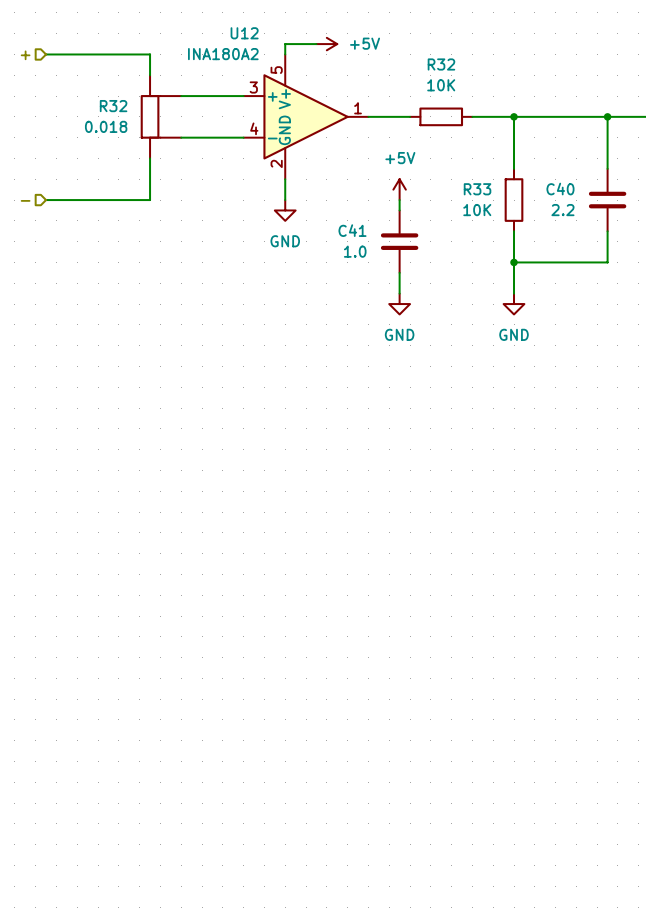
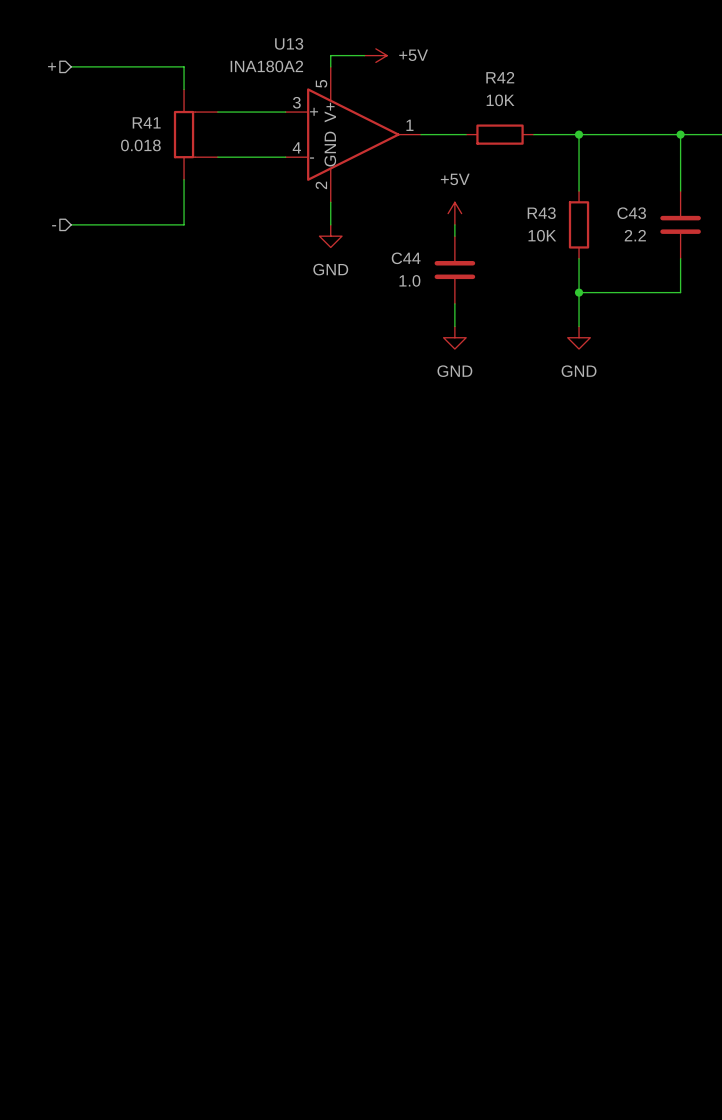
U12 name: U12 (244, 33) -> U13 (289, 43)
R32 name: R32 (441, 64) -> R42 (500, 77)
R32 name: R32 (113, 106) -> R41 (146, 122)
R33 name: R33 (477, 189) -> R43 (541, 213)
C40 name: C40 (560, 189) -> C43 (631, 213)
C41 name: C41 (352, 230) -> C44 (406, 258)

